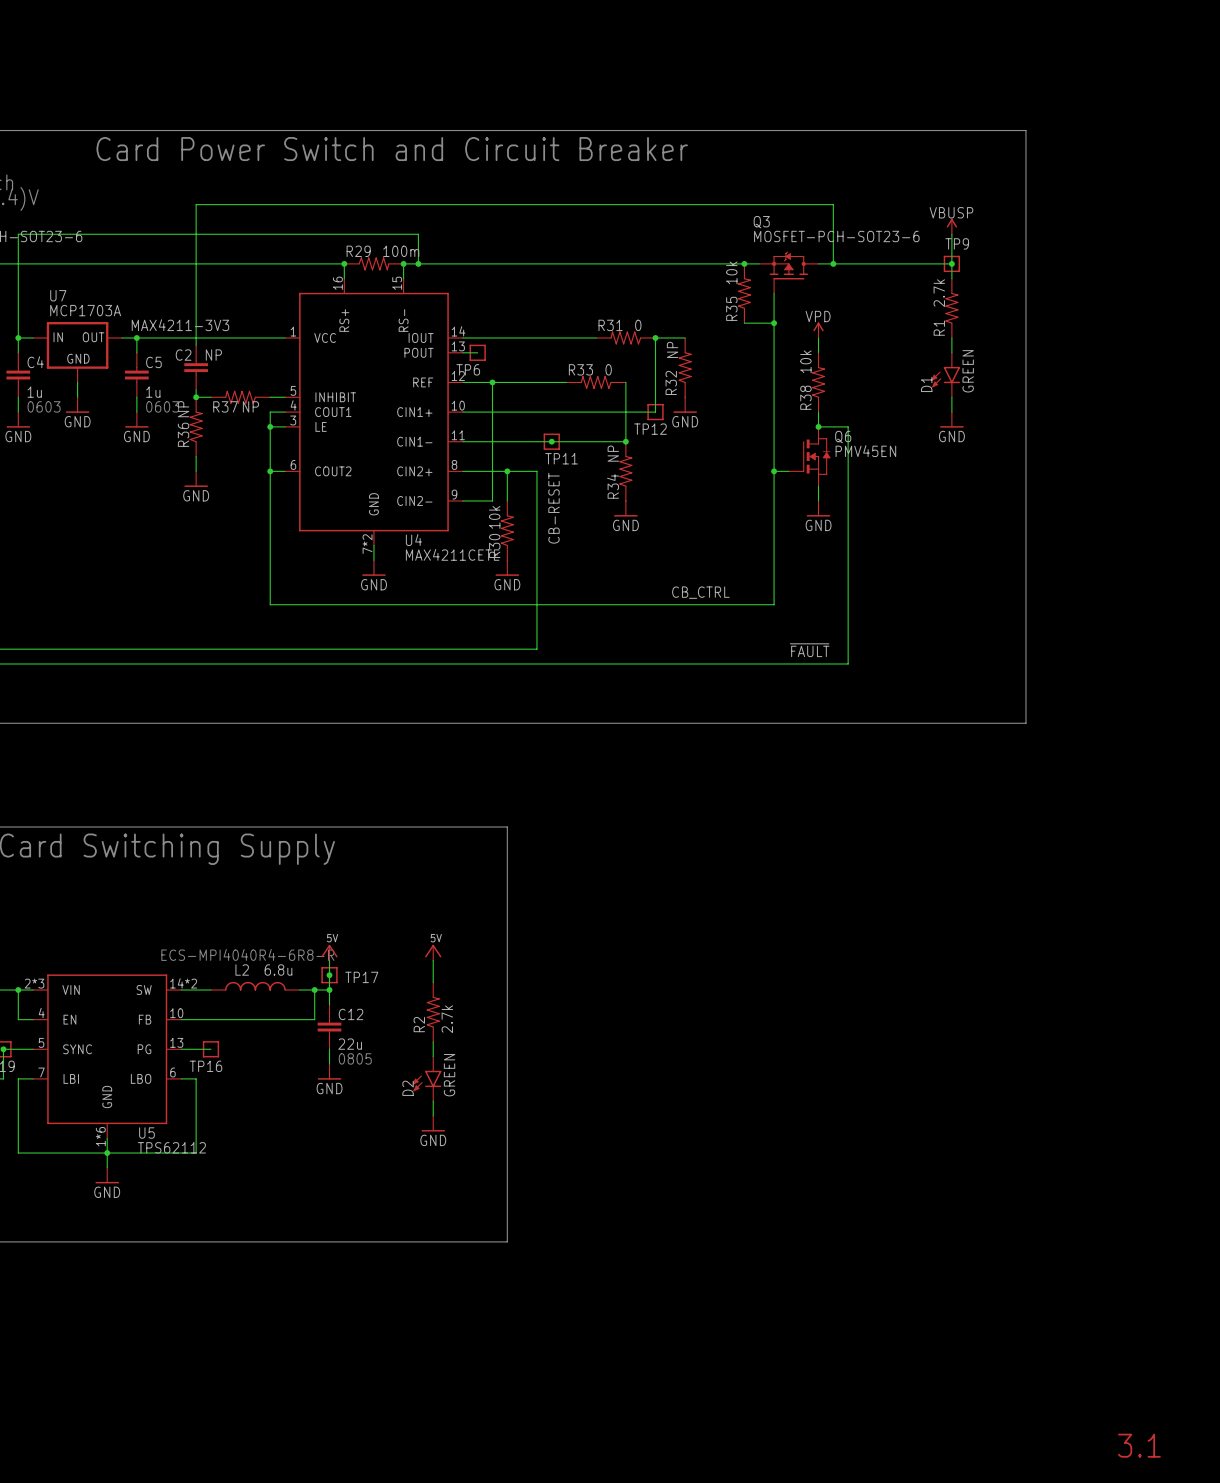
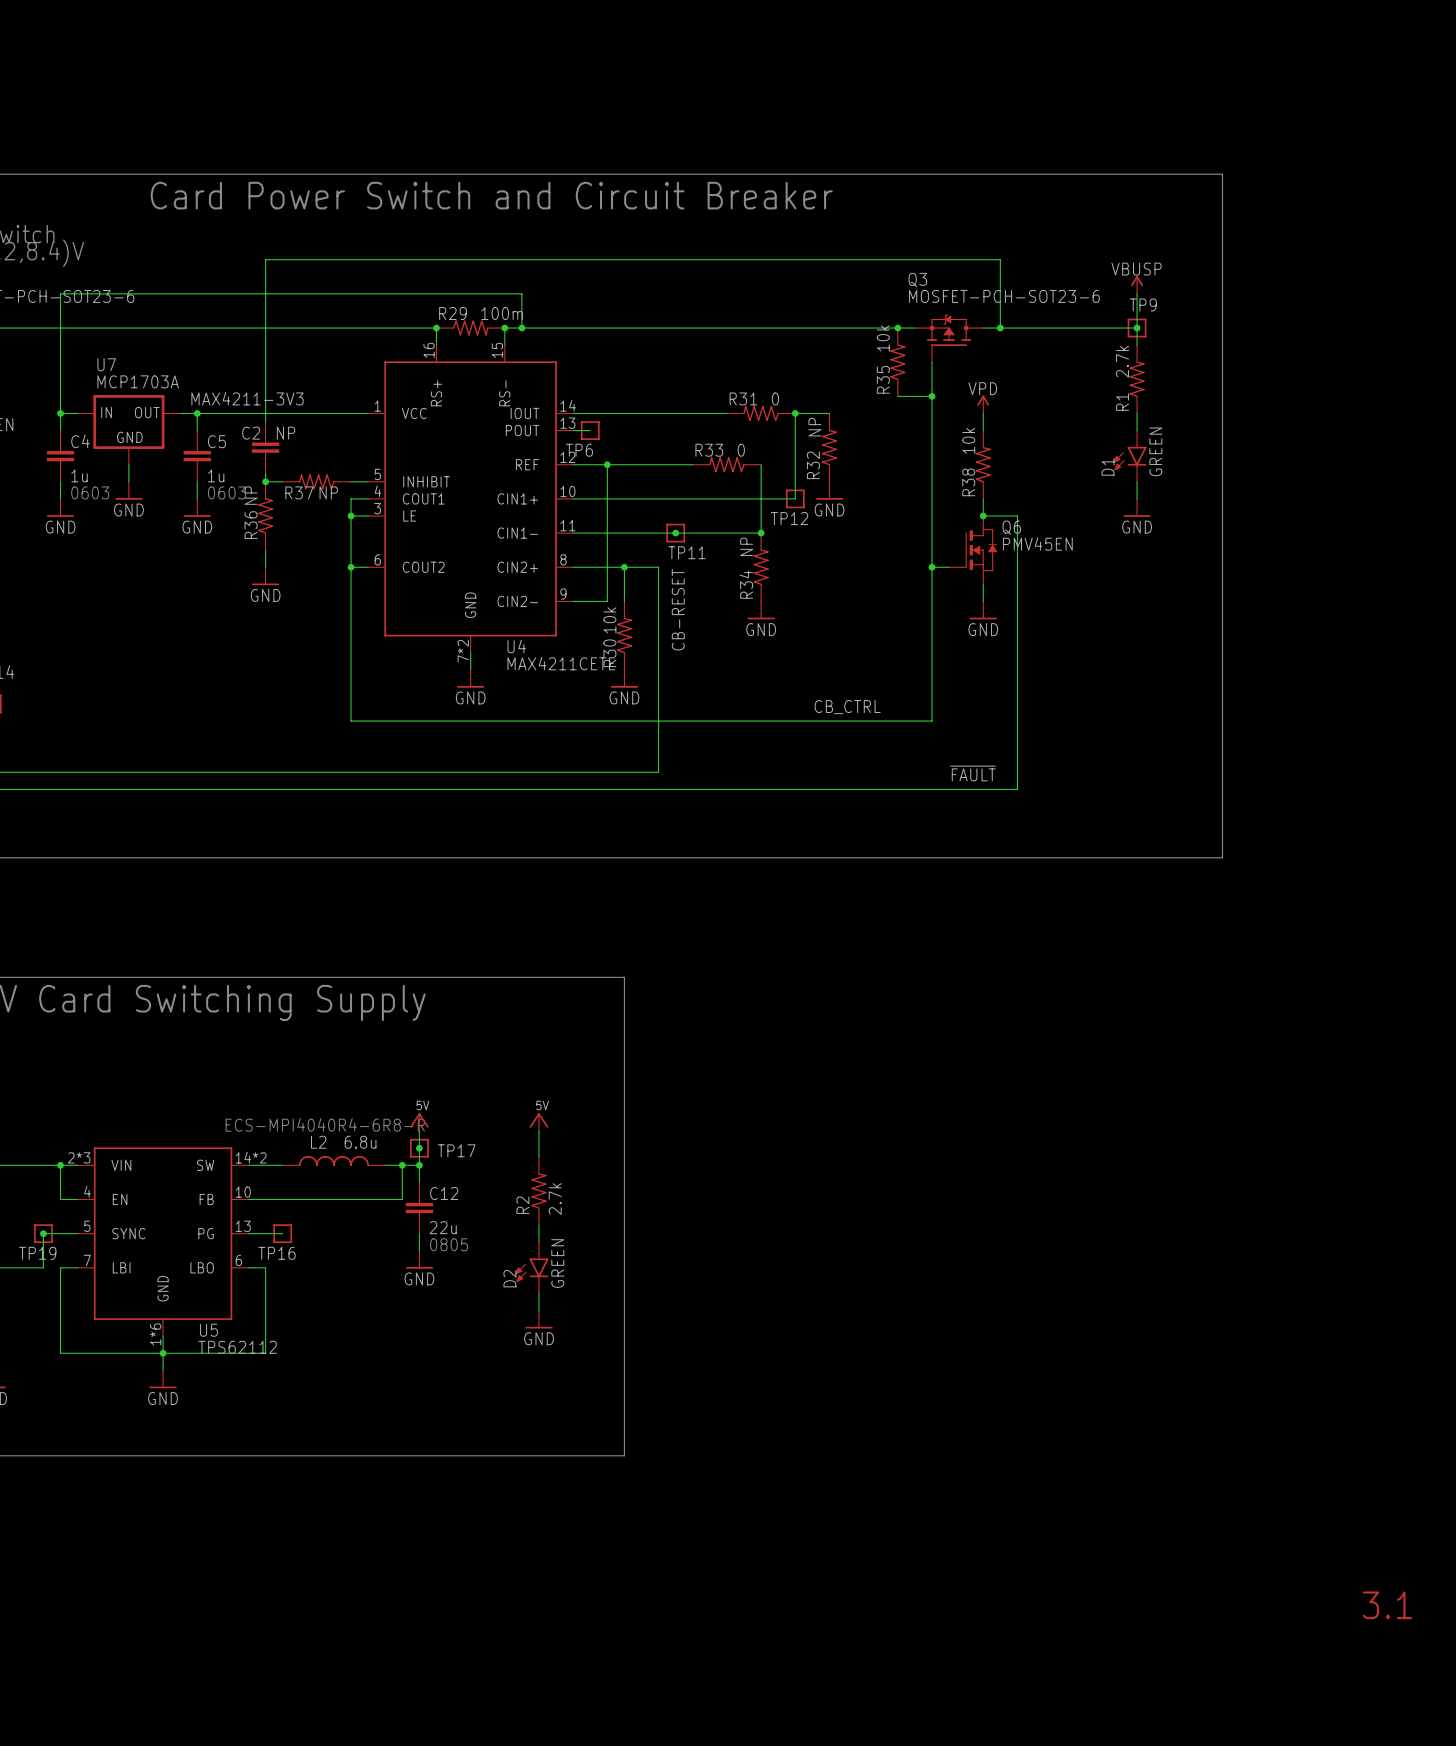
text position: 3.1 (1139, 1445) -> 3.1 (1387, 1605)

